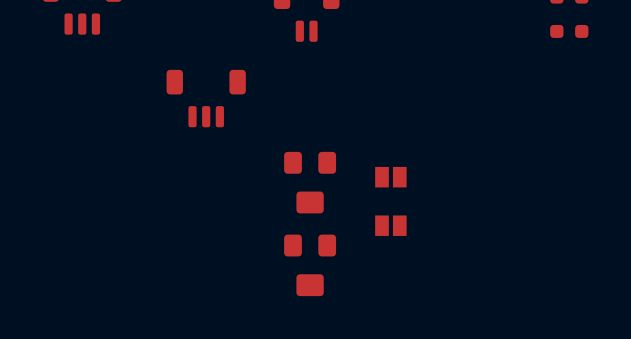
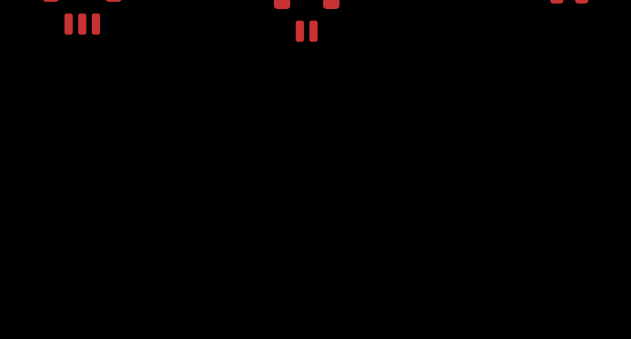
part: (569, 31) -> none
part: (206, 98) -> none
part: (390, 177) -> none
part: (310, 182) -> none
part: (390, 225) -> none
part: (310, 265) -> none

